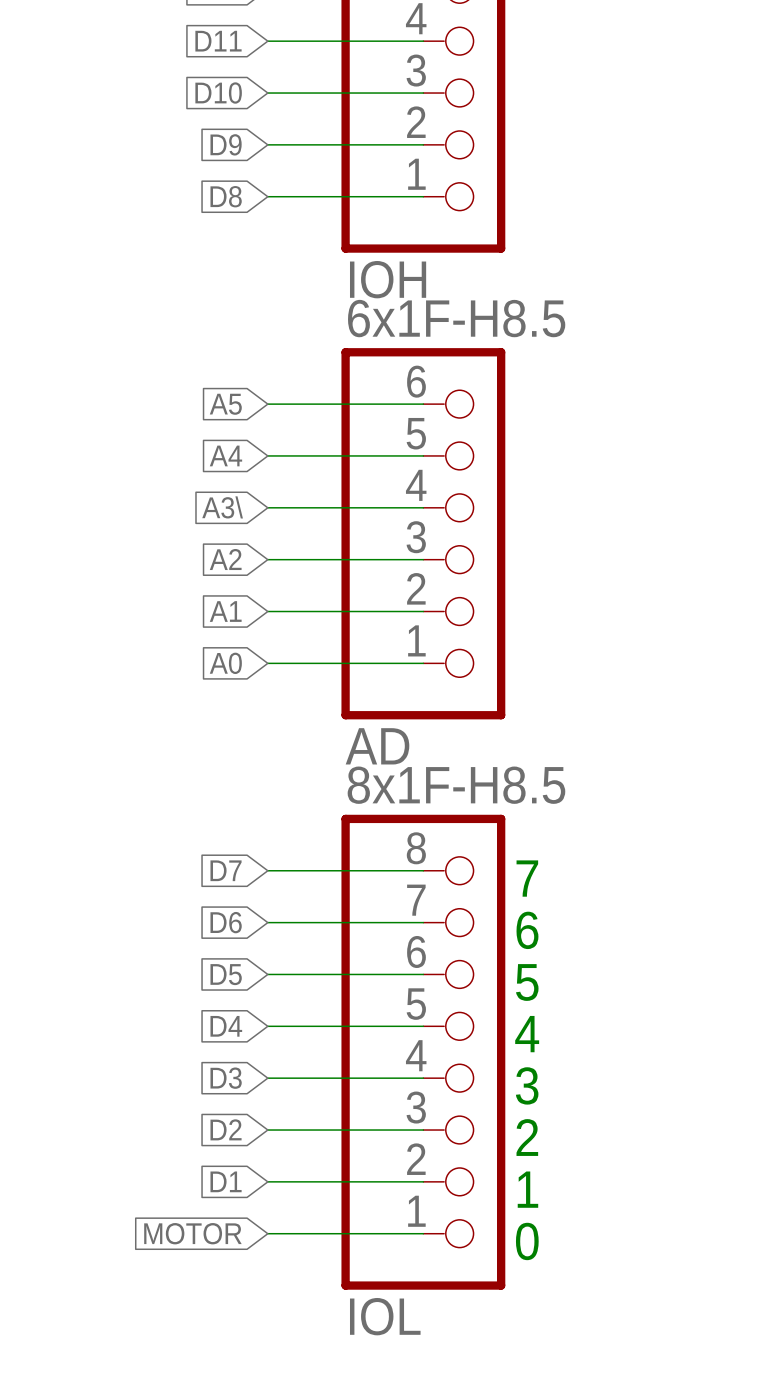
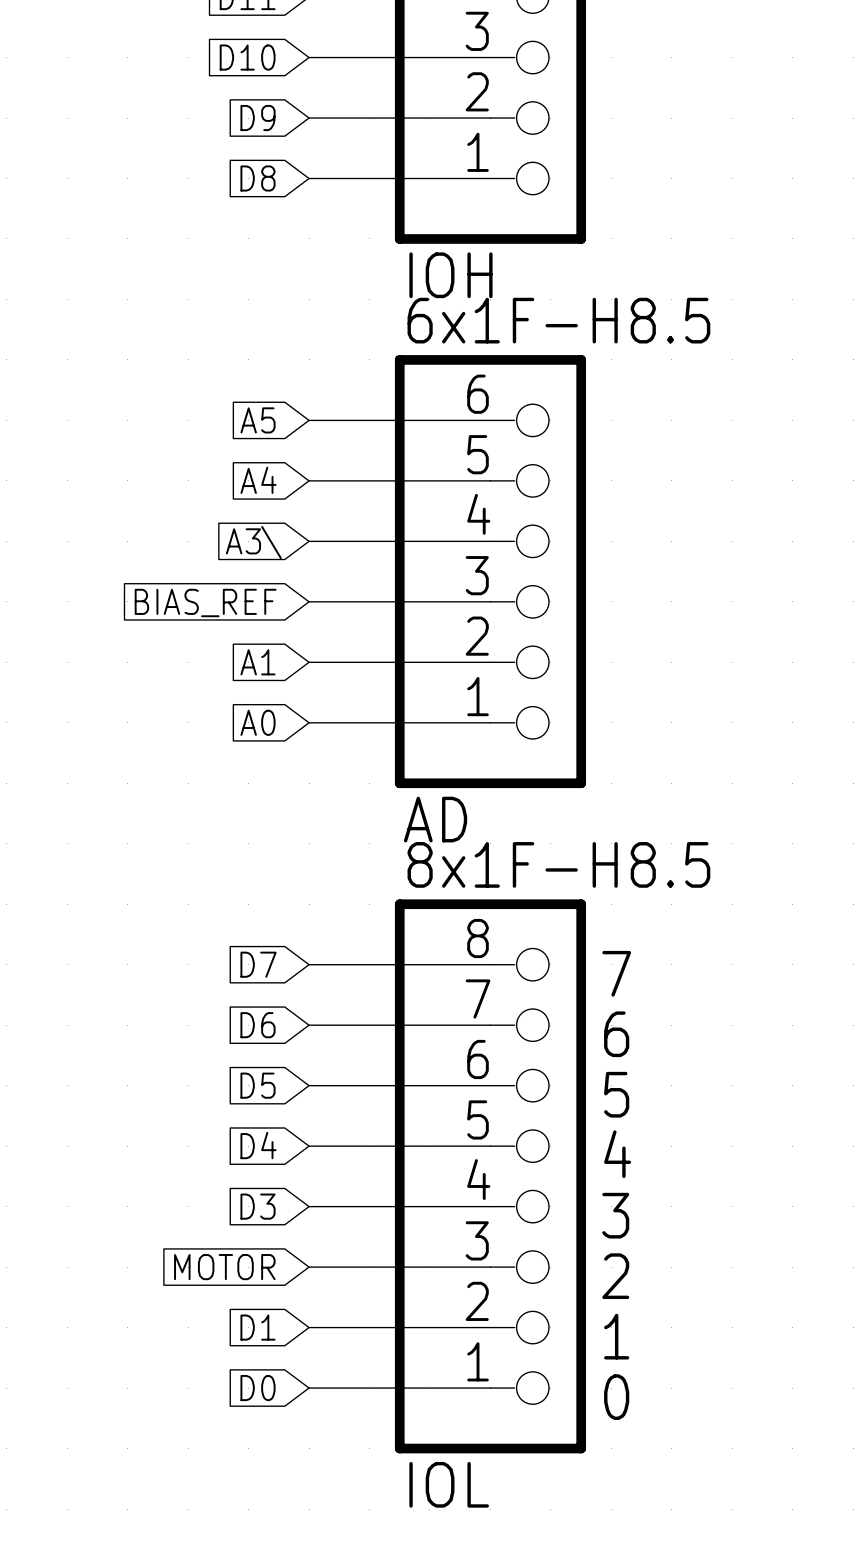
global label: A2 (225, 559) -> BIAS_REF (205, 602)
global label: D2 (226, 1129) -> MOTOR (224, 1267)
global label: MOTOR (192, 1233) -> D0 (258, 1388)

